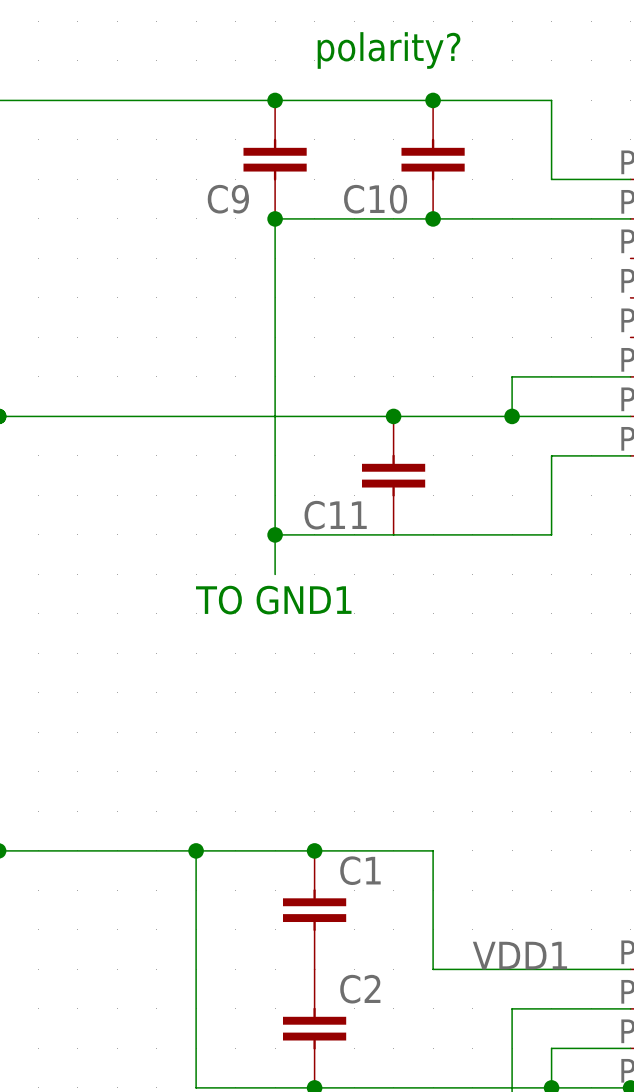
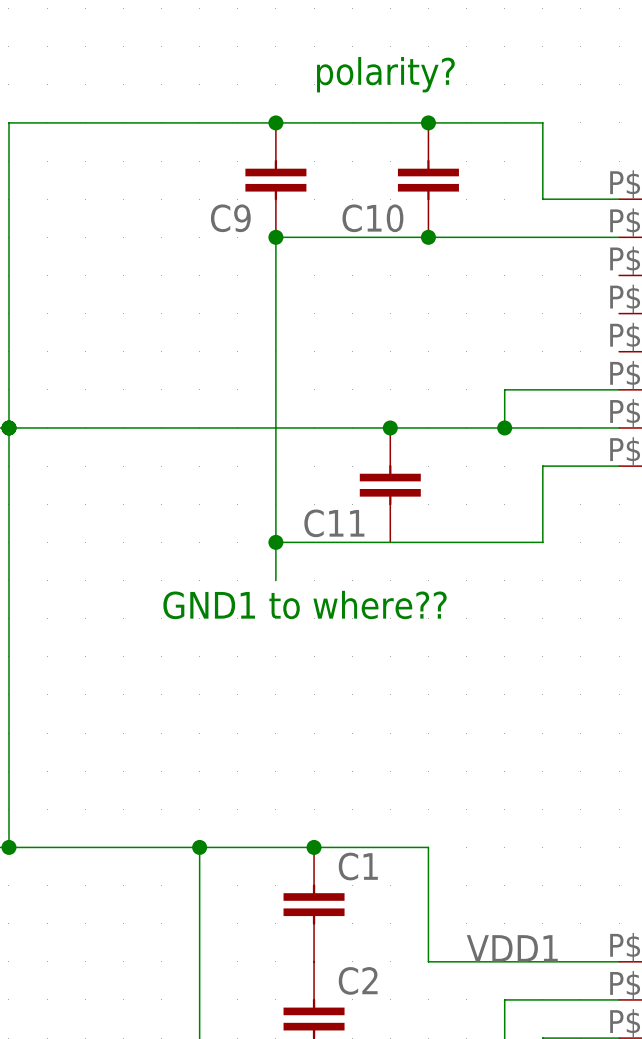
text: none -> GND1 to where?? (305, 604)
text: TO GND1 (273, 600) -> none

